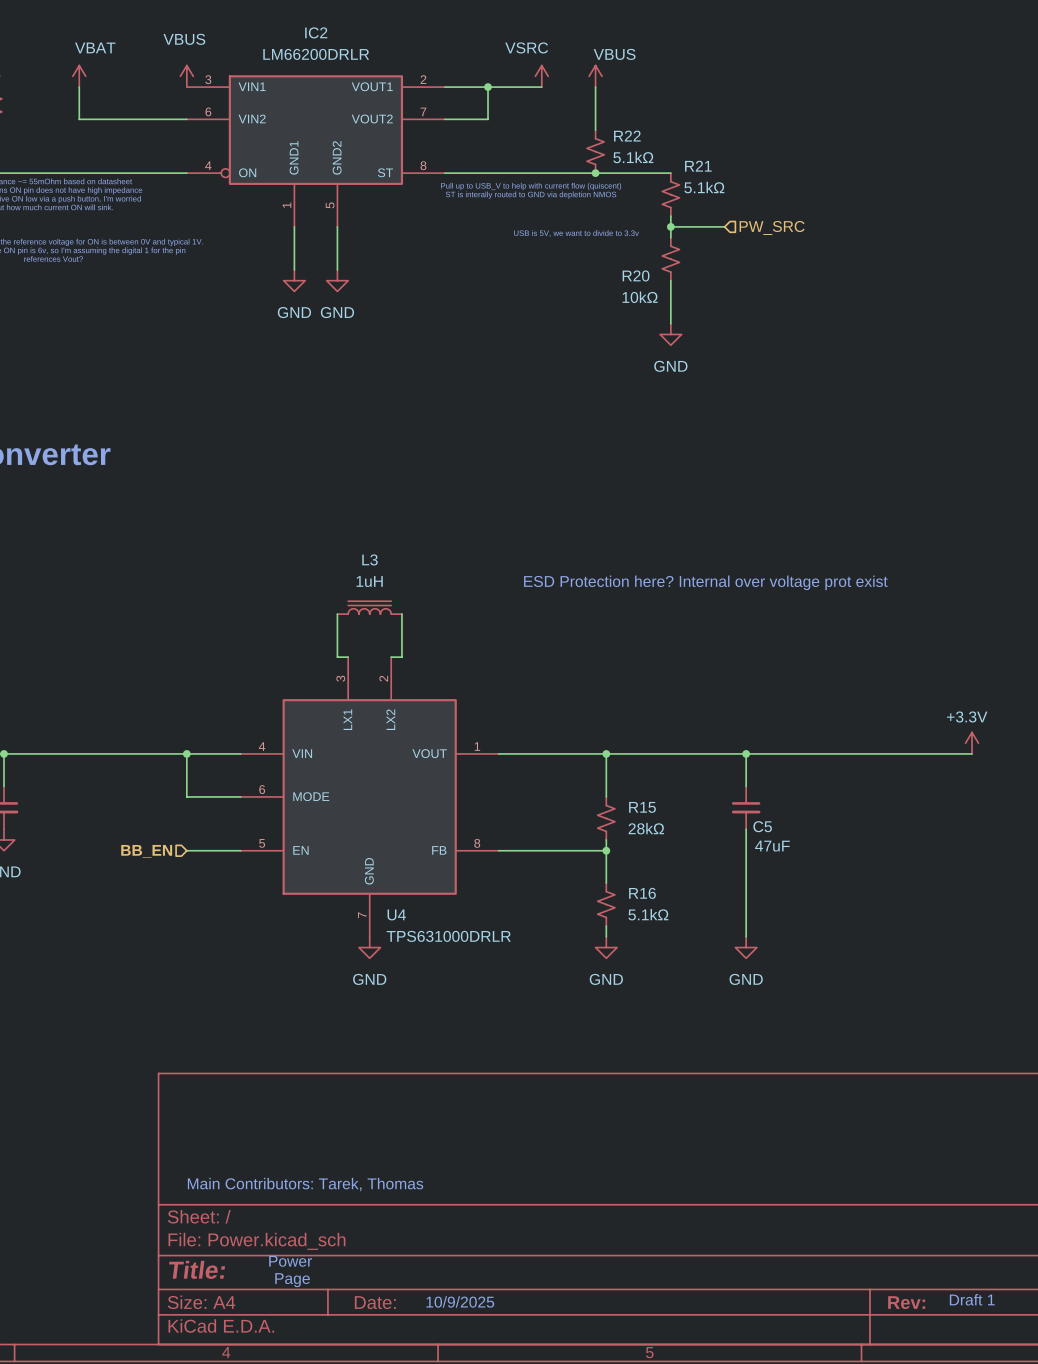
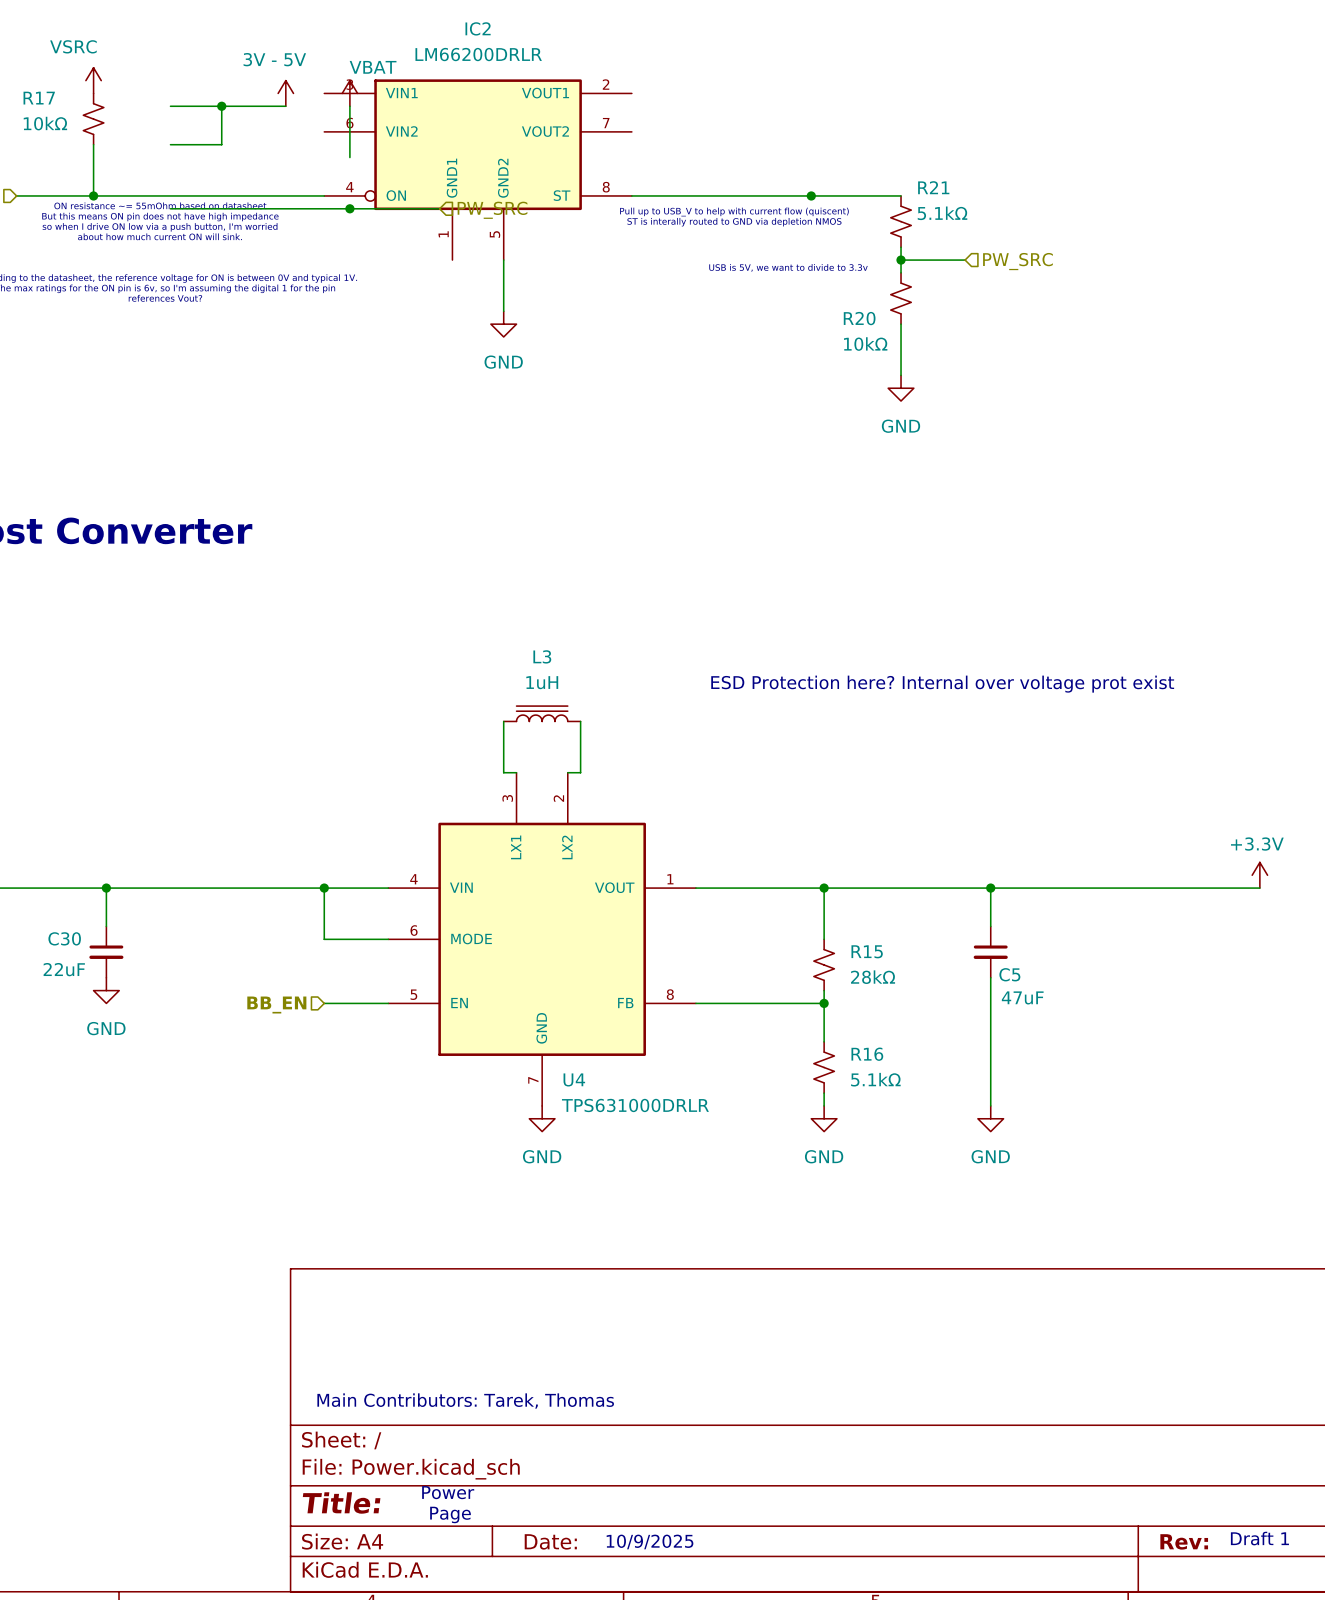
power symbol text position: VBAT (95, 47) -> VBAT (373, 67)
power symbol position: VBAT (79, 76) -> VBAT (349, 93)
power symbol: VBUS (186, 76) -> none
power symbol: VSRC (541, 76) -> none
power symbol: VBUS (595, 76) -> none
wire: (79, 87) (79, 119) (186, 119) -> none
power symbol: none -> 3V - 5V (285, 93)
wire: (444, 87) (541, 87) -> none
wire: (488, 87) (488, 119) (444, 119) -> none
junction: (488, 87) -> none
wire: (595, 87) (595, 130) -> none
wire: none -> (170, 106) (285, 106)
wire: none -> (221, 106) (221, 144) (170, 144)
junction: none -> (221, 106)
R22: 5.1kΩ (595, 151) -> none
wire: none -> (170, 208) (439, 208)
junction: none -> (349, 208)
hierarchical label: none -> PW_SRC (492, 210)
wire: (294, 226) (294, 269) -> (349, 106) (349, 157)
power symbol: GND (294, 280) -> none

